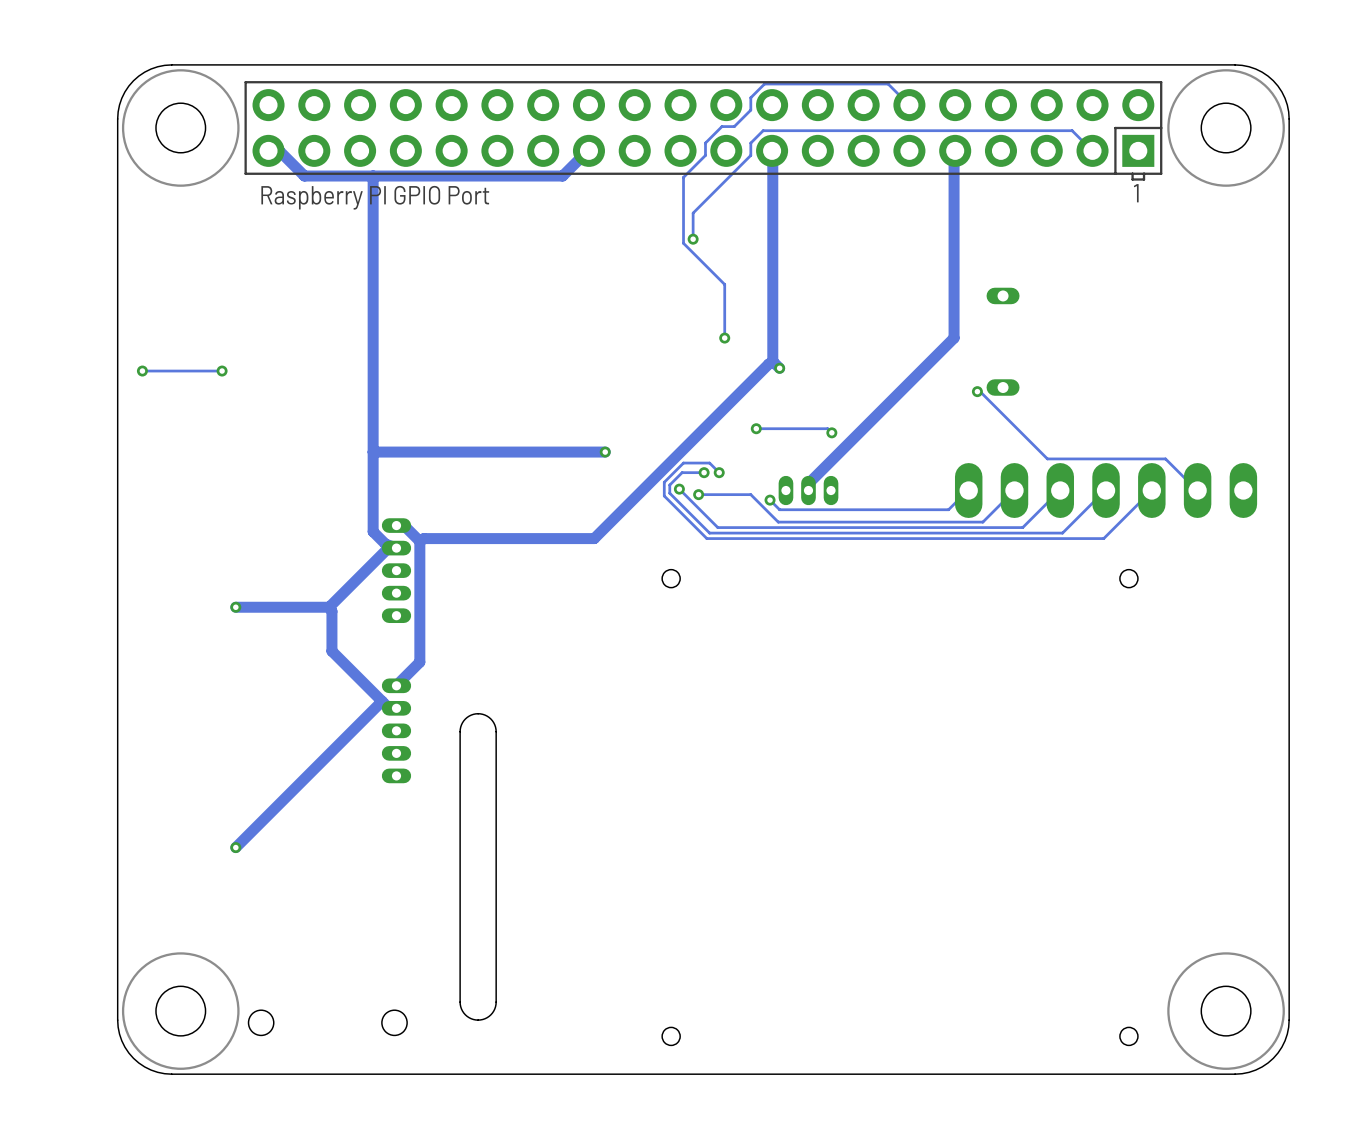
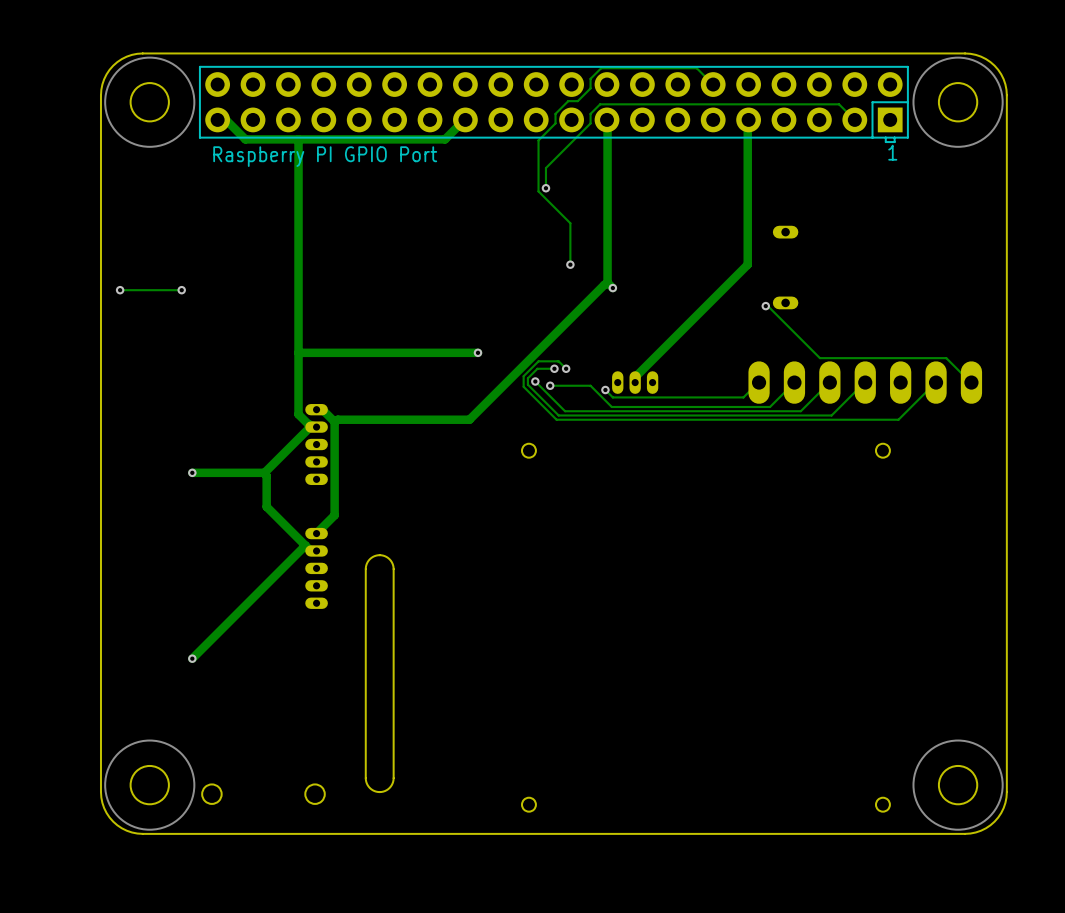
track: (756, 428) (827, 428) (831, 432) -> none
via: (756, 428) -> none
via: (831, 432) -> none
track: (1165, 458) (1197, 490) -> (911, 358) (946, 358) (971, 382)
track: (1151, 490) (1103, 538) -> (935, 382) (898, 419) (863, 419)

